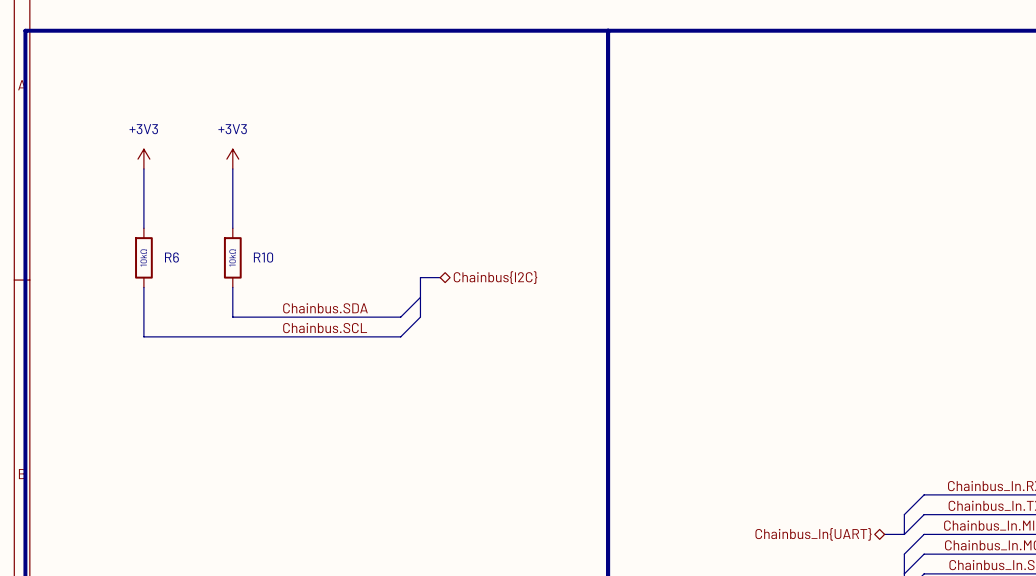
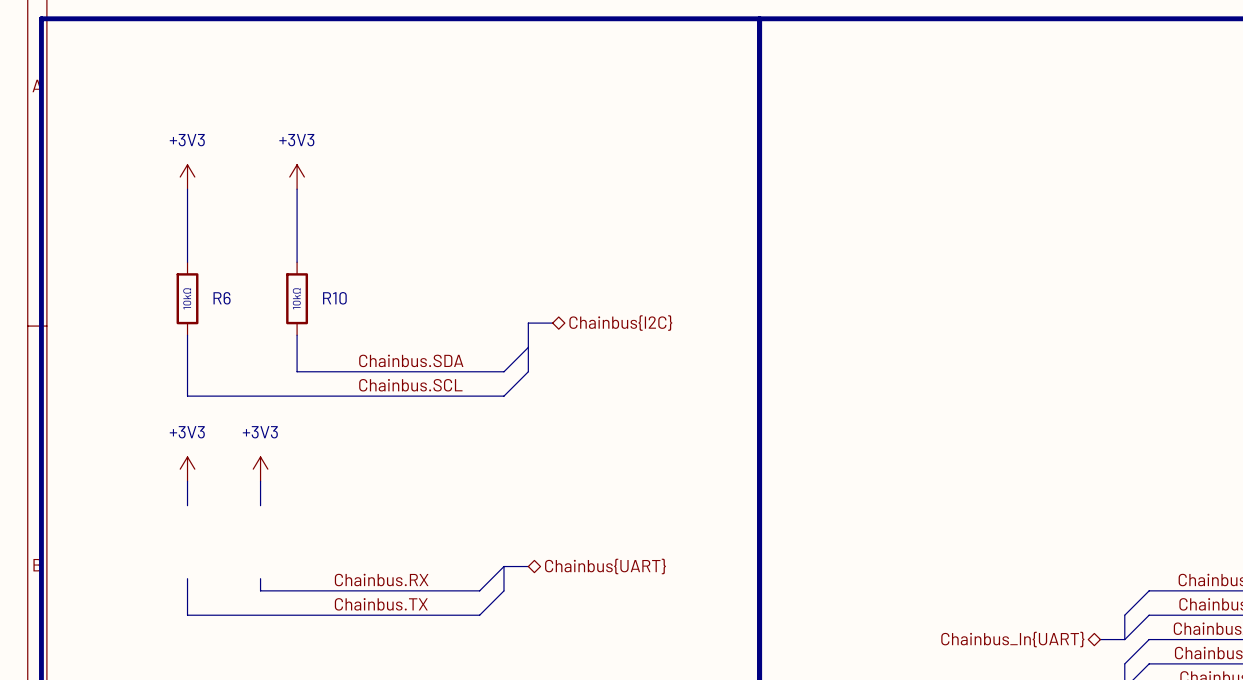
power symbol: none -> +3V3 (187, 469)
power symbol: none -> +3V3 (260, 469)
wire: none -> (187, 481) (187, 505)
wire: none -> (260, 481) (260, 505)
wire: none -> (503, 566) (479, 590) (260, 590) (260, 578)
bus: none -> (528, 566) (503, 566) (503, 590)
hierarchical label: none -> Chainbus{UART} (605, 566)
wire: none -> (187, 578) (187, 615) (479, 615) (503, 590)
label: none -> Chainbus.RX (381, 580)
label: none -> Chainbus.TX (381, 604)

